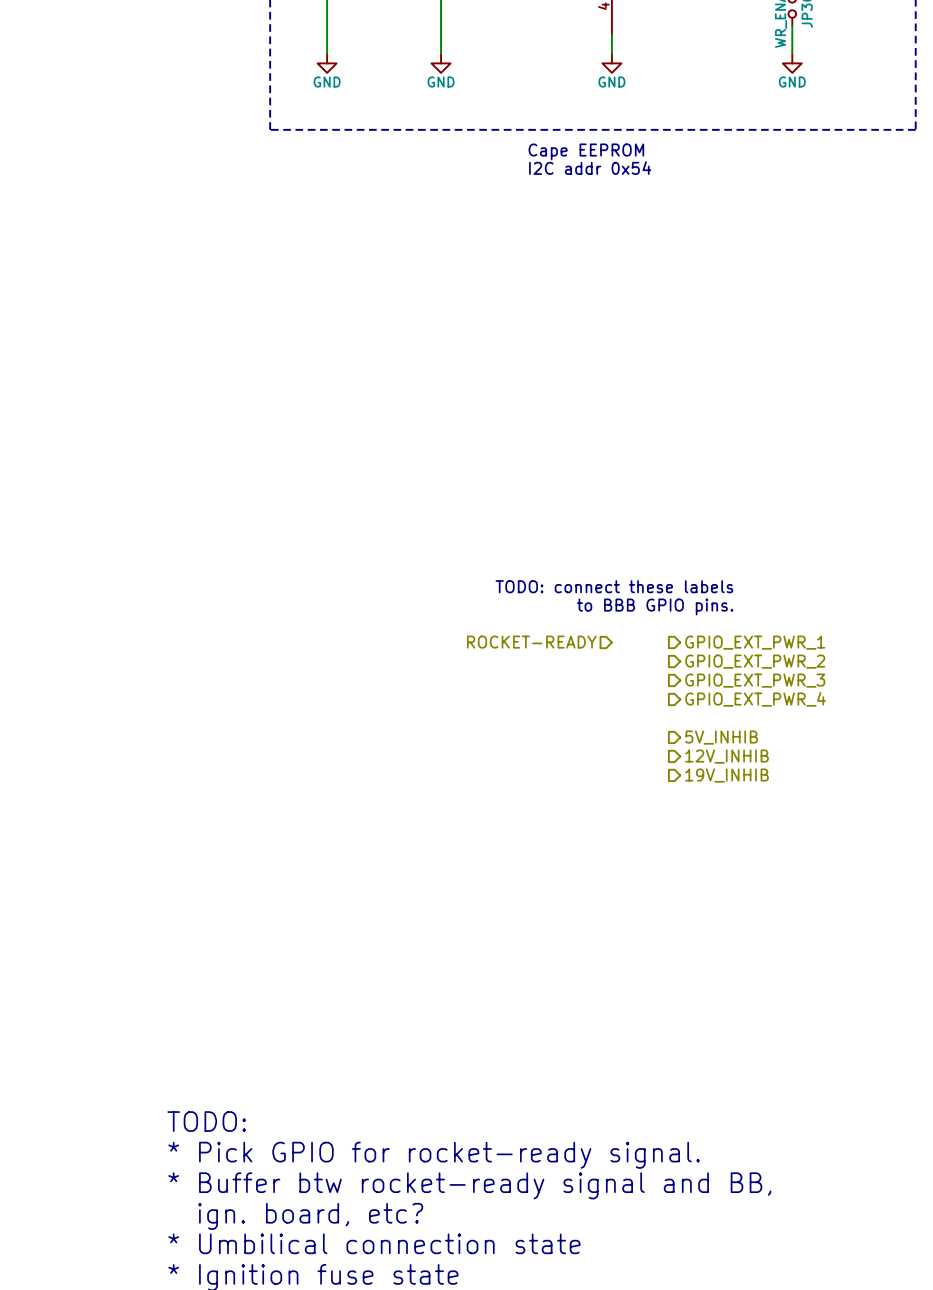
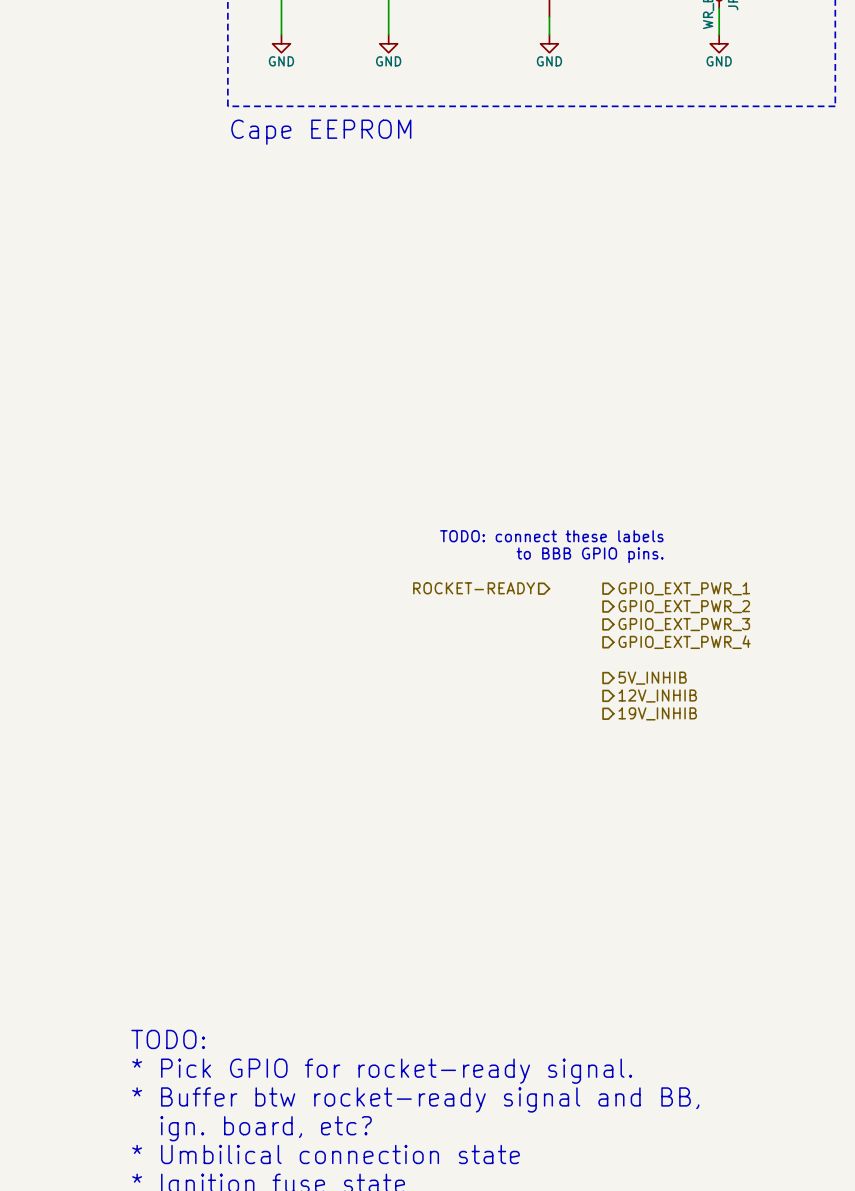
text: Cape EEPROM (586, 151) -> none
text: none -> Cape EEPROM (321, 132)
text: I2C addr 0x54 (590, 168) -> none

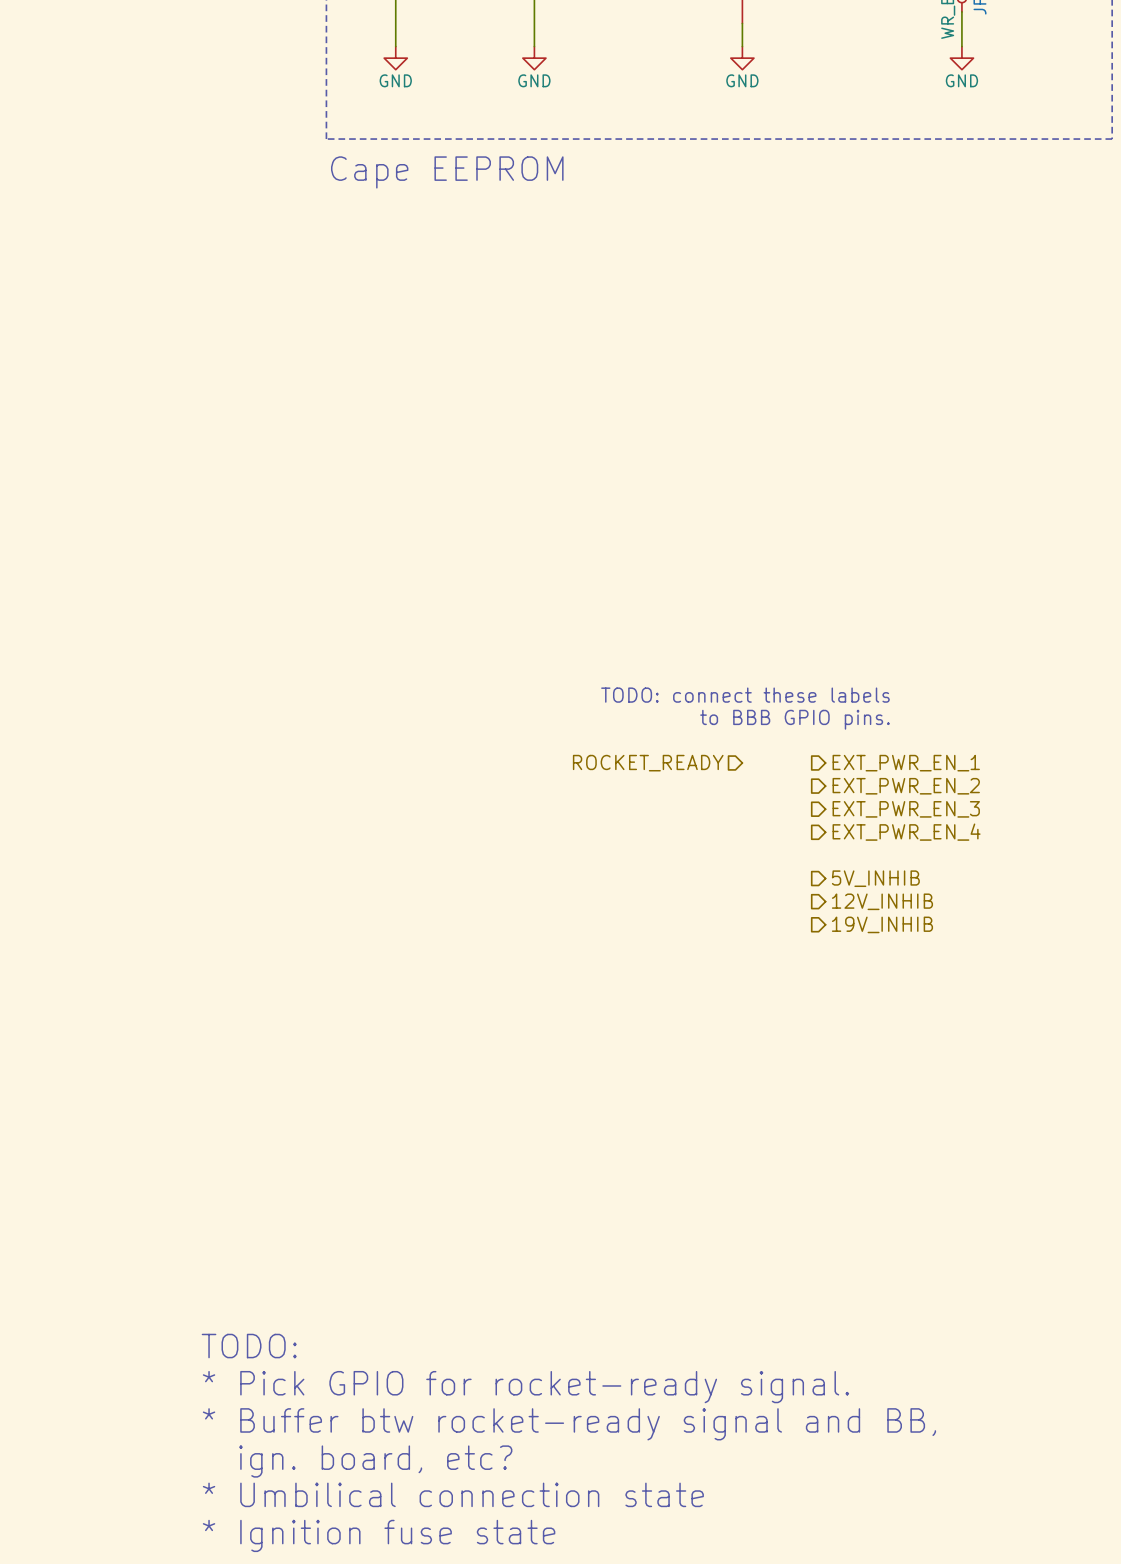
hierarchical label: ROCKET-READY (474, 588) -> ROCKET_READY (648, 763)
hierarchical label: GPIO_EXT_PWR_1 (684, 588) -> EXT_PWR_EN_1 (906, 763)
hierarchical label: GPIO_EXT_PWR_2 (684, 606) -> EXT_PWR_EN_2 (906, 786)
hierarchical label: GPIO_EXT_PWR_3 (684, 624) -> EXT_PWR_EN_3 (906, 809)
hierarchical label: GPIO_EXT_PWR_4 (684, 642) -> EXT_PWR_EN_4 (906, 832)

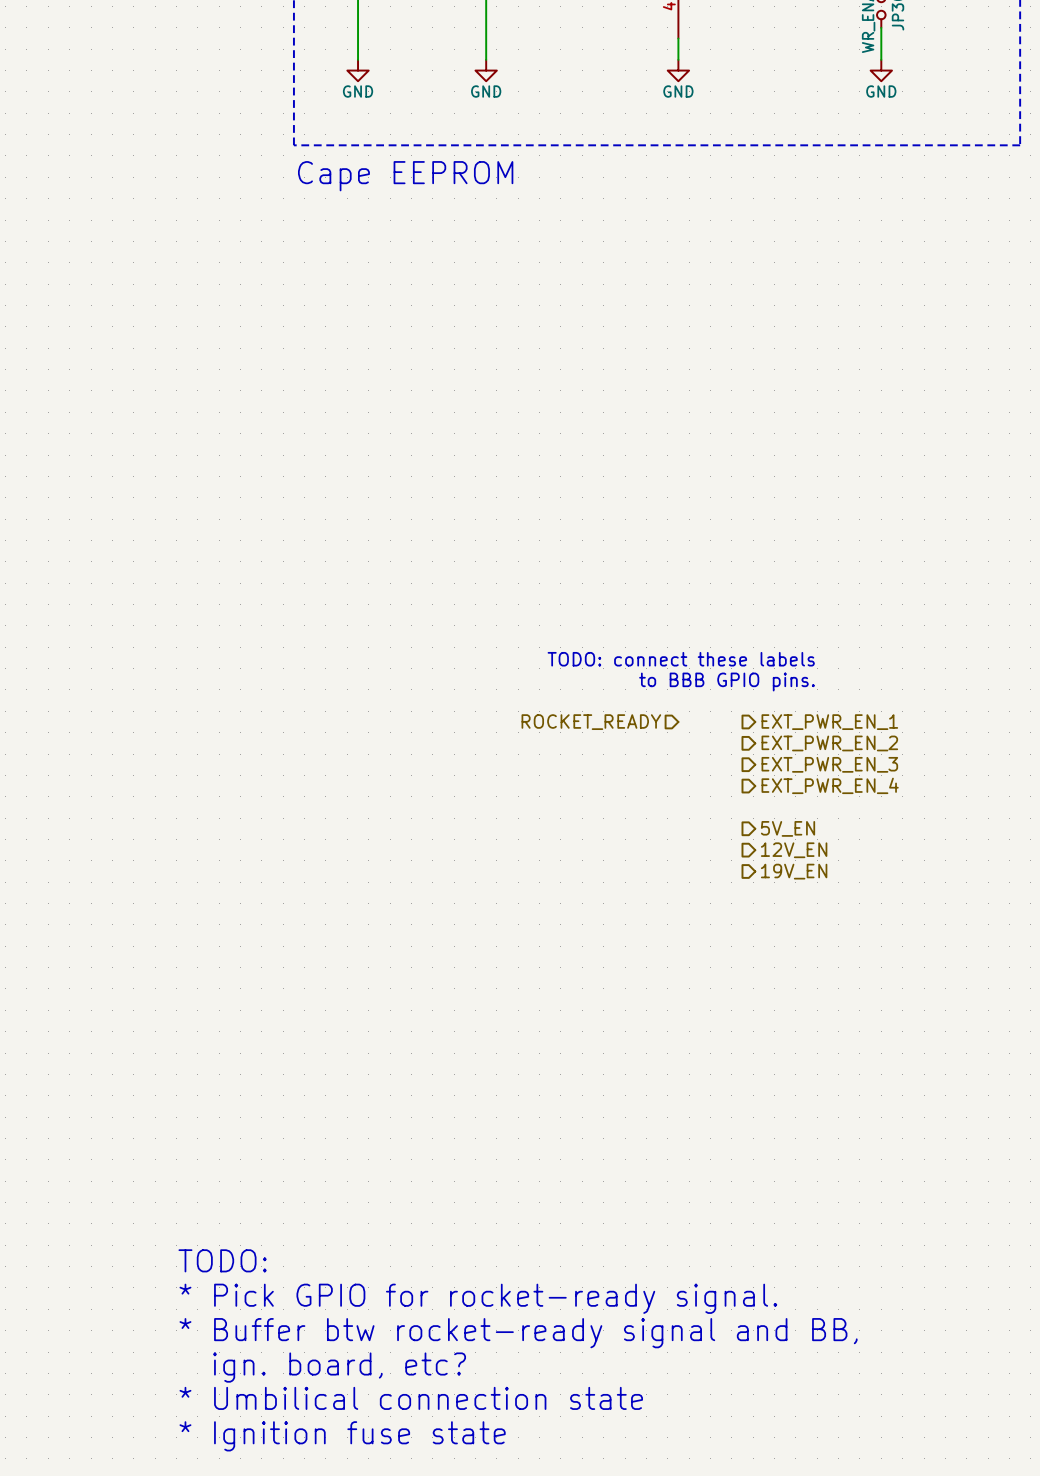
hierarchical label: 5V_INHIB (875, 878) -> 5V_EN (788, 828)
hierarchical label: 12V_INHIB (882, 901) -> 12V_EN (794, 850)
hierarchical label: 19V_INHIB (882, 924) -> 19V_EN (794, 871)

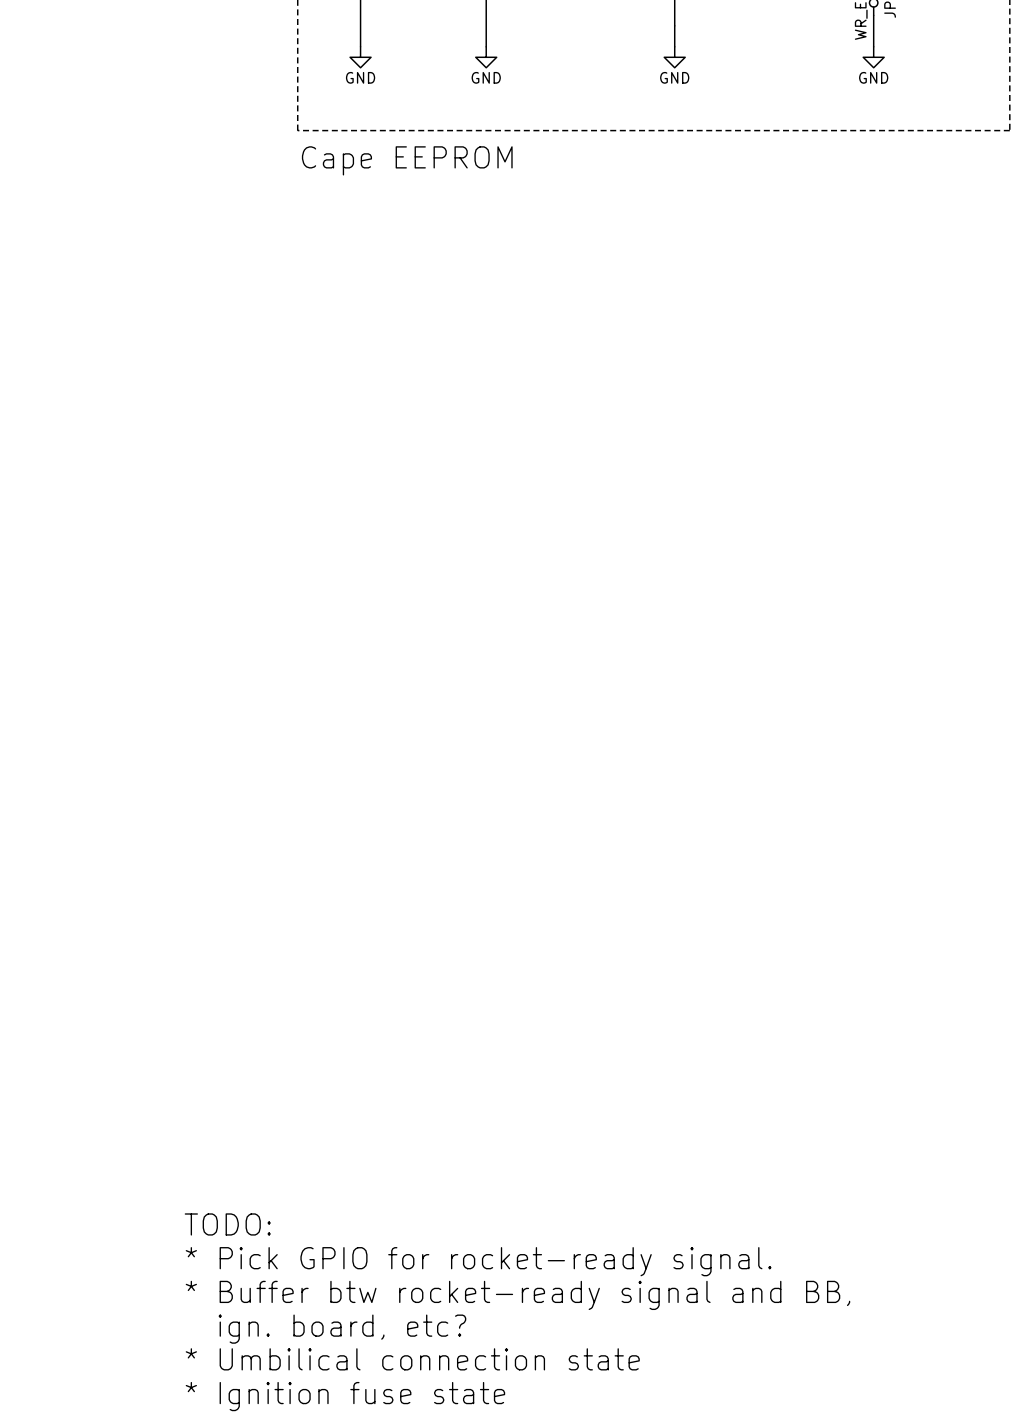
text: TODO: connect these labels (681, 659) -> none
text: to BBB GPIO pins. (726, 682) -> none
hierarchical label: ROCKET_READY (591, 722) -> none
hierarchical label: EXT_PWR_EN_1 (829, 722) -> none
hierarchical label: EXT_PWR_EN_2 (829, 743) -> none
hierarchical label: EXT_PWR_EN_3 (829, 764) -> none
hierarchical label: EXT_PWR_EN_4 (830, 785) -> none
hierarchical label: 5V_EN (788, 828) -> none
hierarchical label: 12V_EN (794, 850) -> none
hierarchical label: 19V_EN (794, 871) -> none

